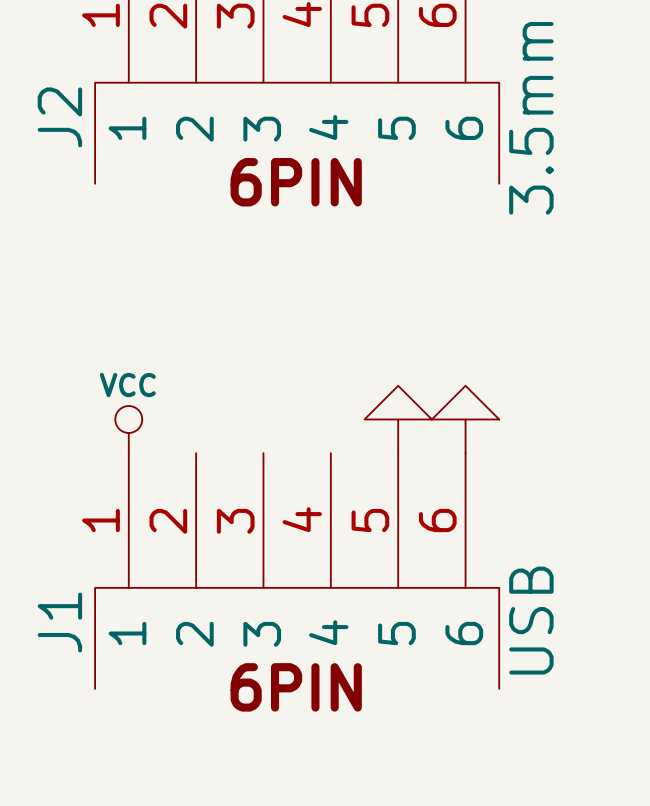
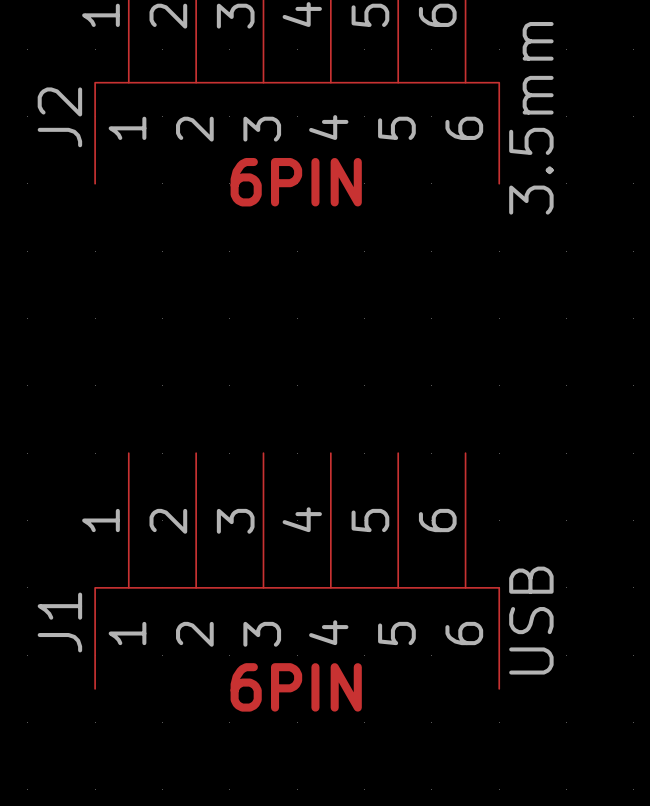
power symbol: (398, 419) -> none
power symbol: (465, 419) -> none
power symbol: VCC (128, 429) -> none

